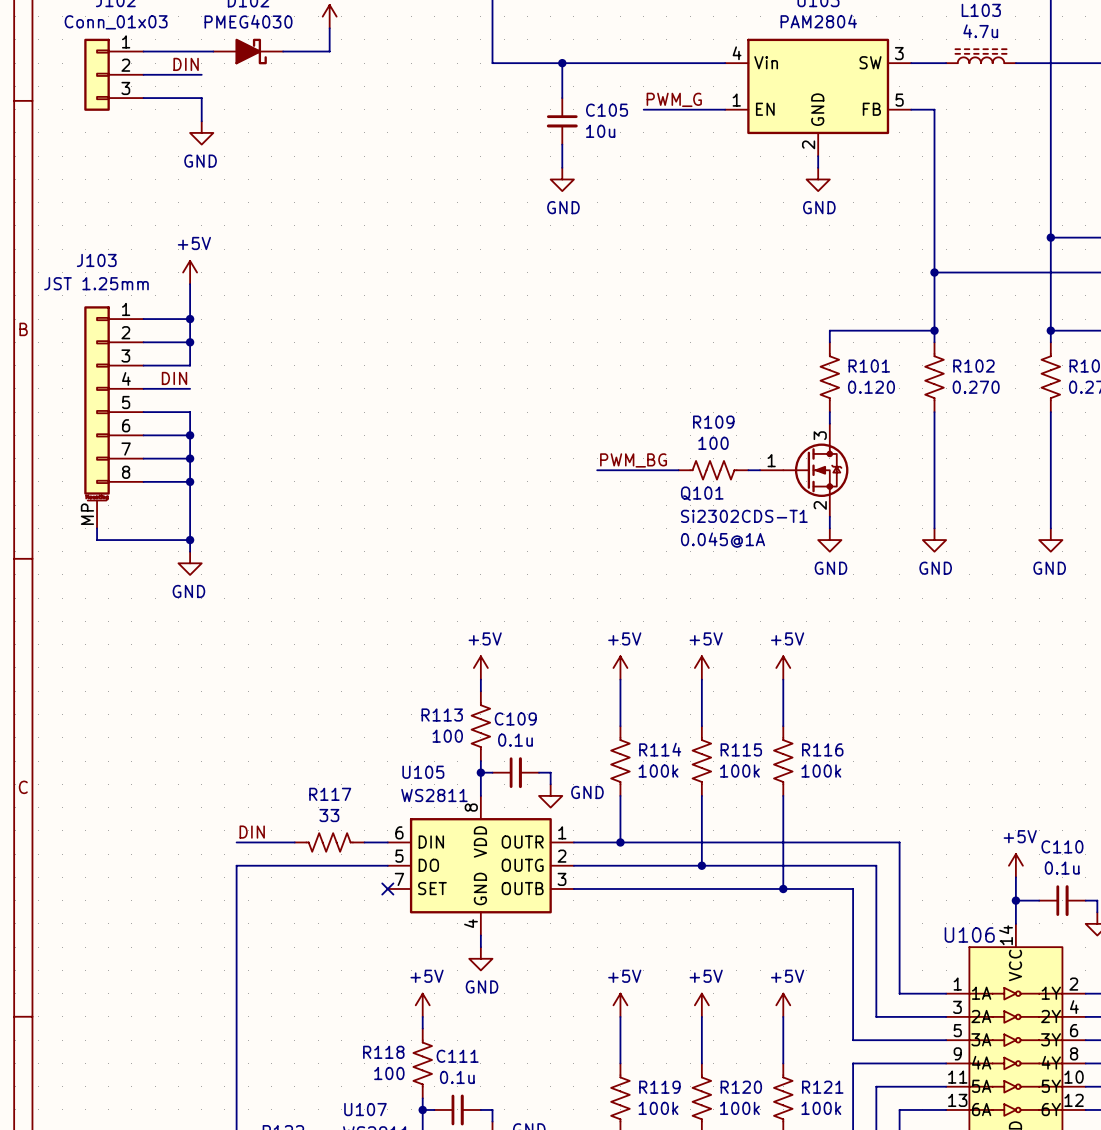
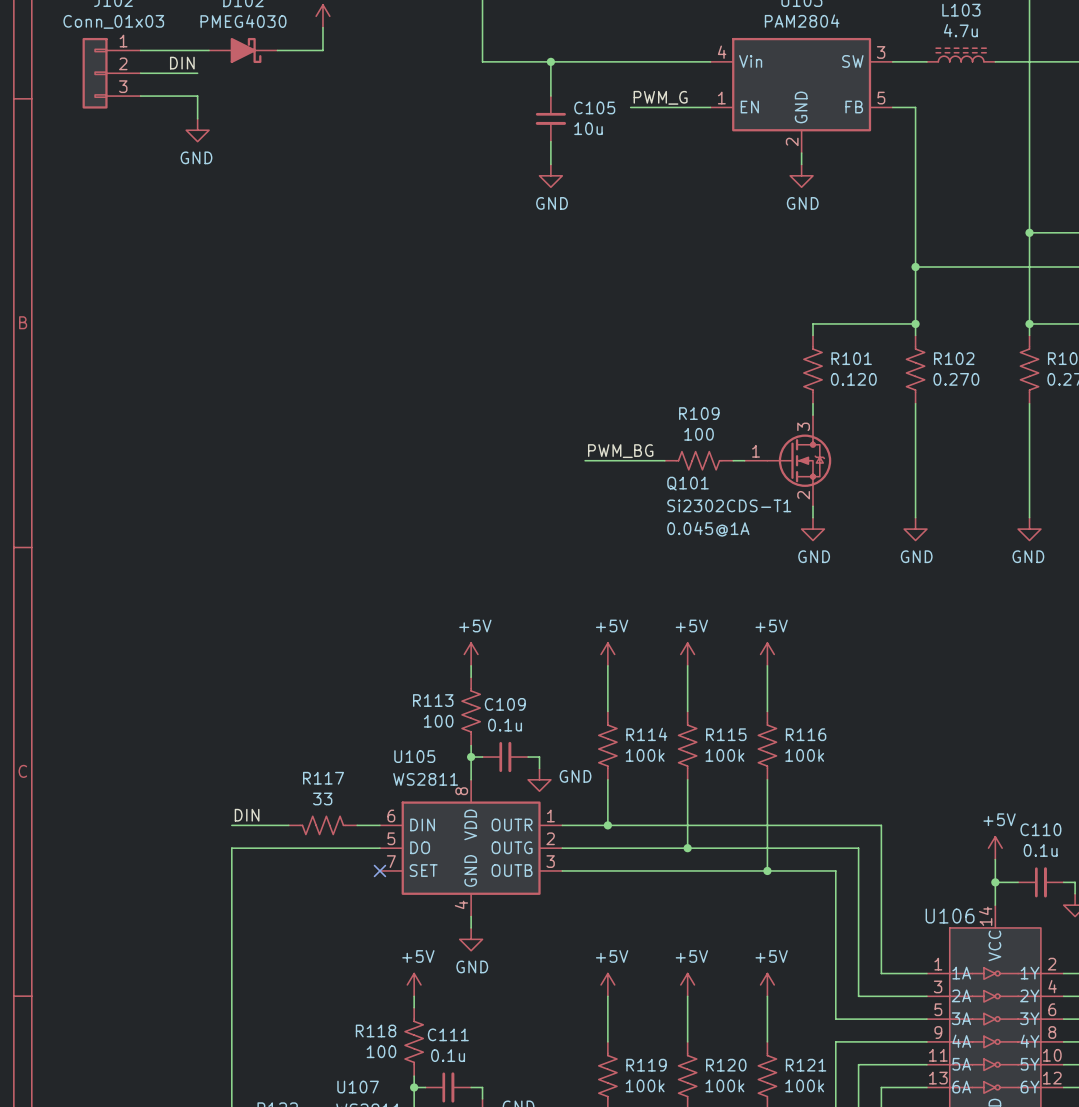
power symbol: +5V (190, 272) -> none
wire: (190, 284) (190, 365) (143, 365) -> none
wire: (143, 319) (190, 319) -> none
junction: (190, 319) -> none
wire: (143, 342) (190, 342) -> none
junction: (190, 342) -> none
label: DIN (174, 378) -> none
wire: (143, 388) (190, 388) -> none
wire: (143, 412) (190, 412) (190, 551) -> none
J103: JST 1.25mm (113, 417) -> none
wire: (143, 435) (190, 435) -> none
junction: (190, 435) -> none
wire: (143, 458) (190, 458) -> none
junction: (190, 458) -> none
wire: (143, 481) (190, 481) -> none
junction: (190, 481) -> none
wire: (97, 528) (97, 540) (190, 540) -> none
junction: (190, 540) -> none
power symbol: GND (190, 563) -> none

